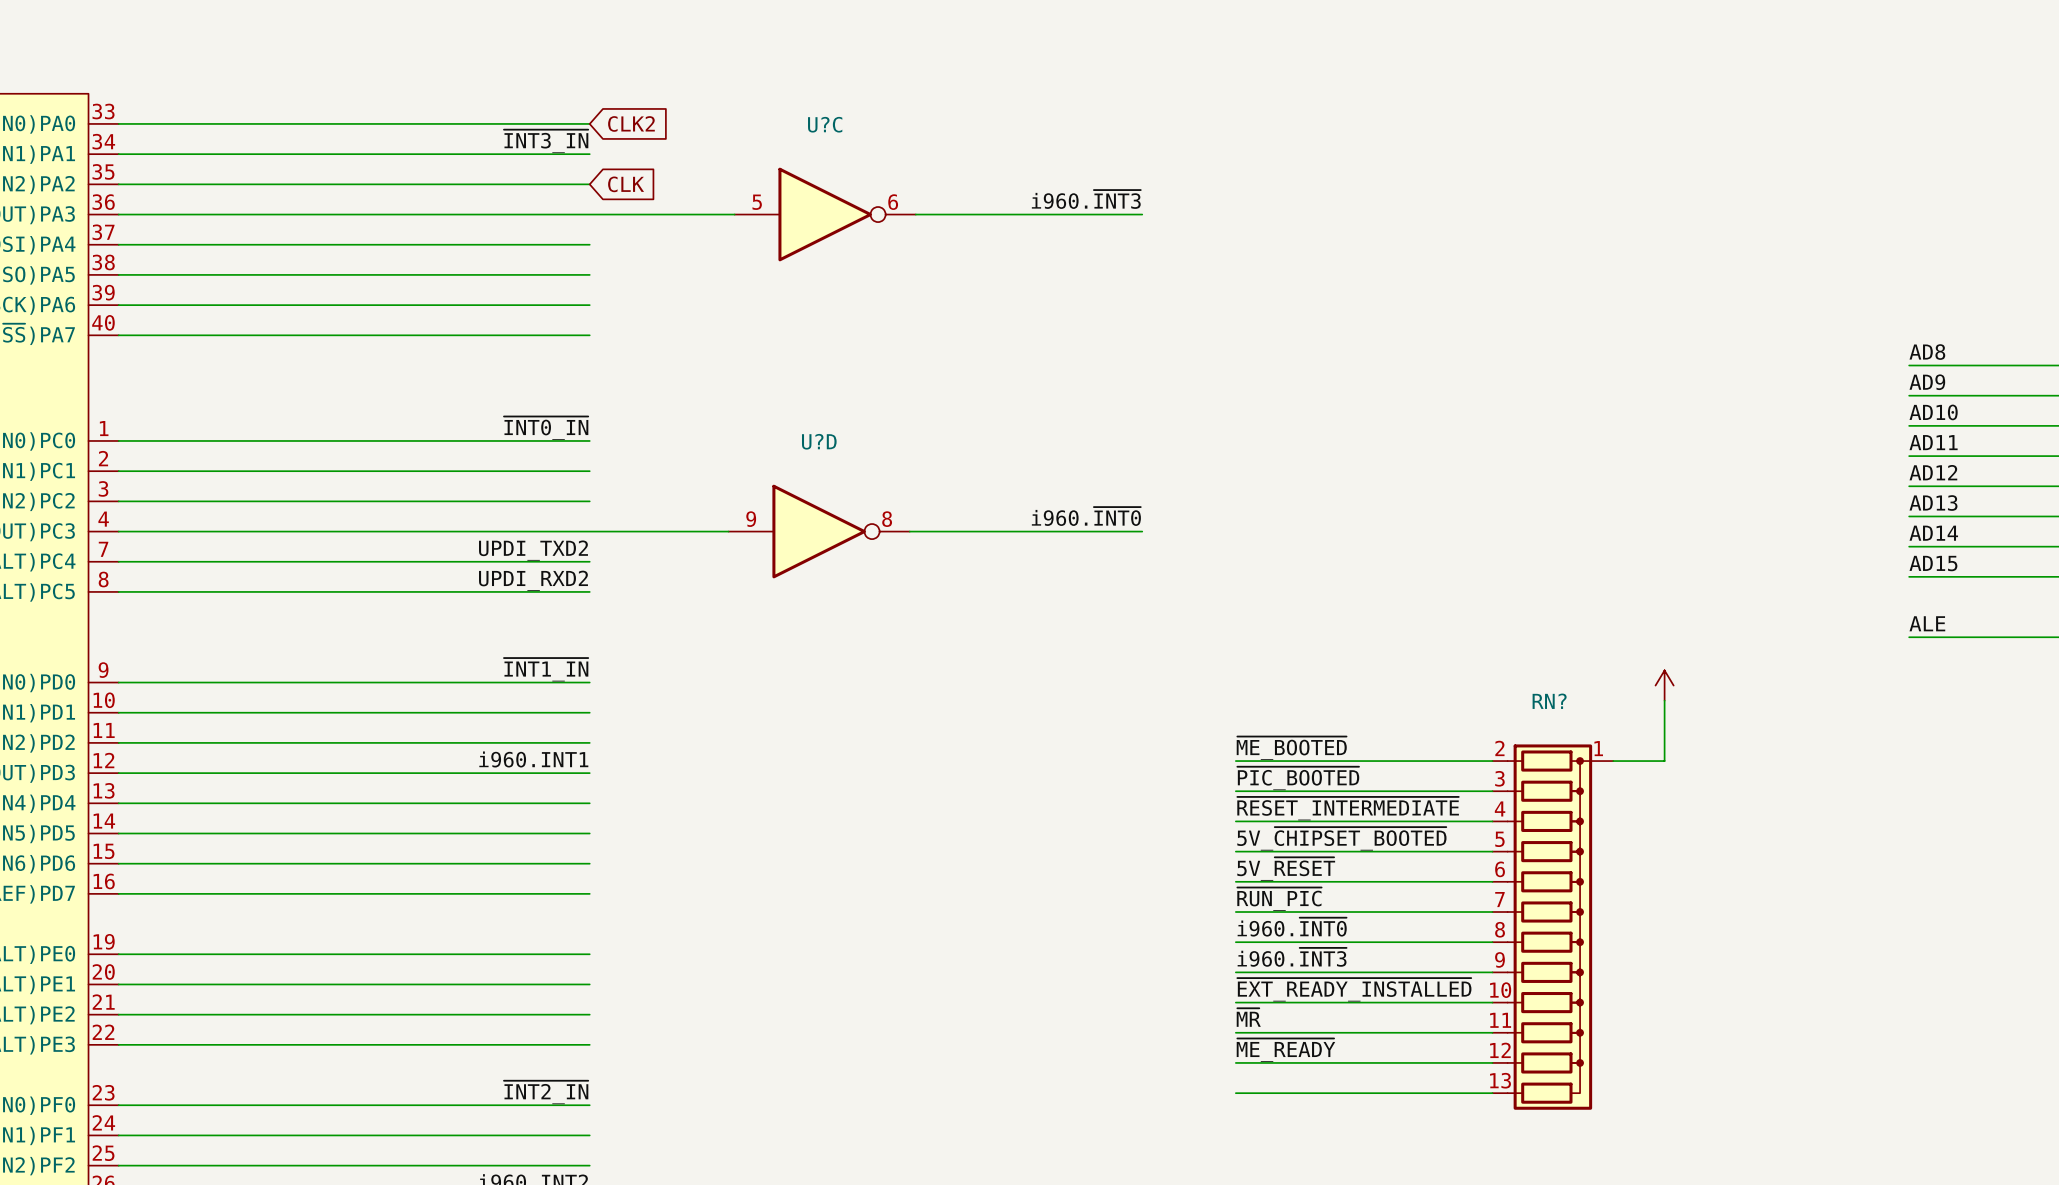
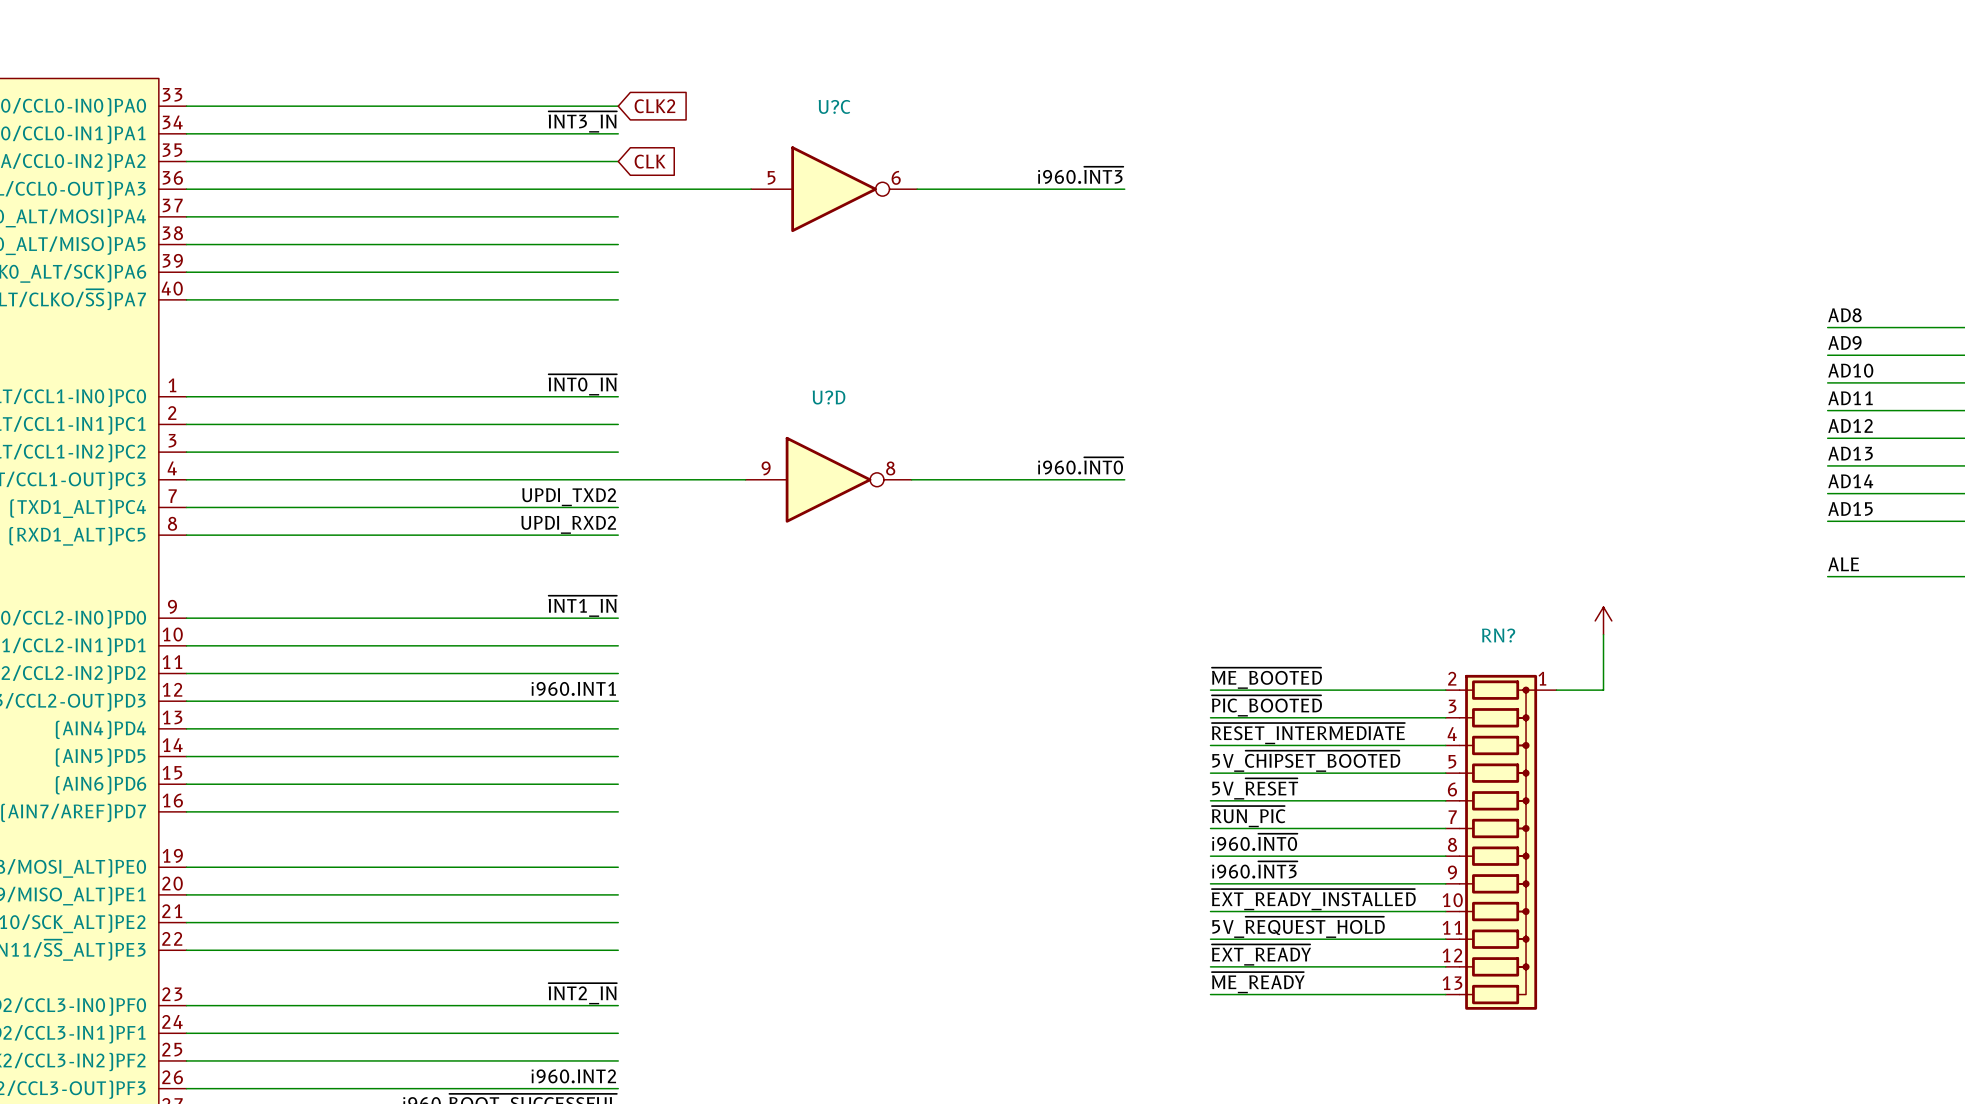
label: ~{MR} (1248, 1017) -> 5V_~{REQUEST_HOLD} (1298, 927)
label: ~{ME_READY} (1285, 1050) -> ~{EXT_READY} (1261, 955)
label: none -> ~{ME_READY} (1258, 982)

